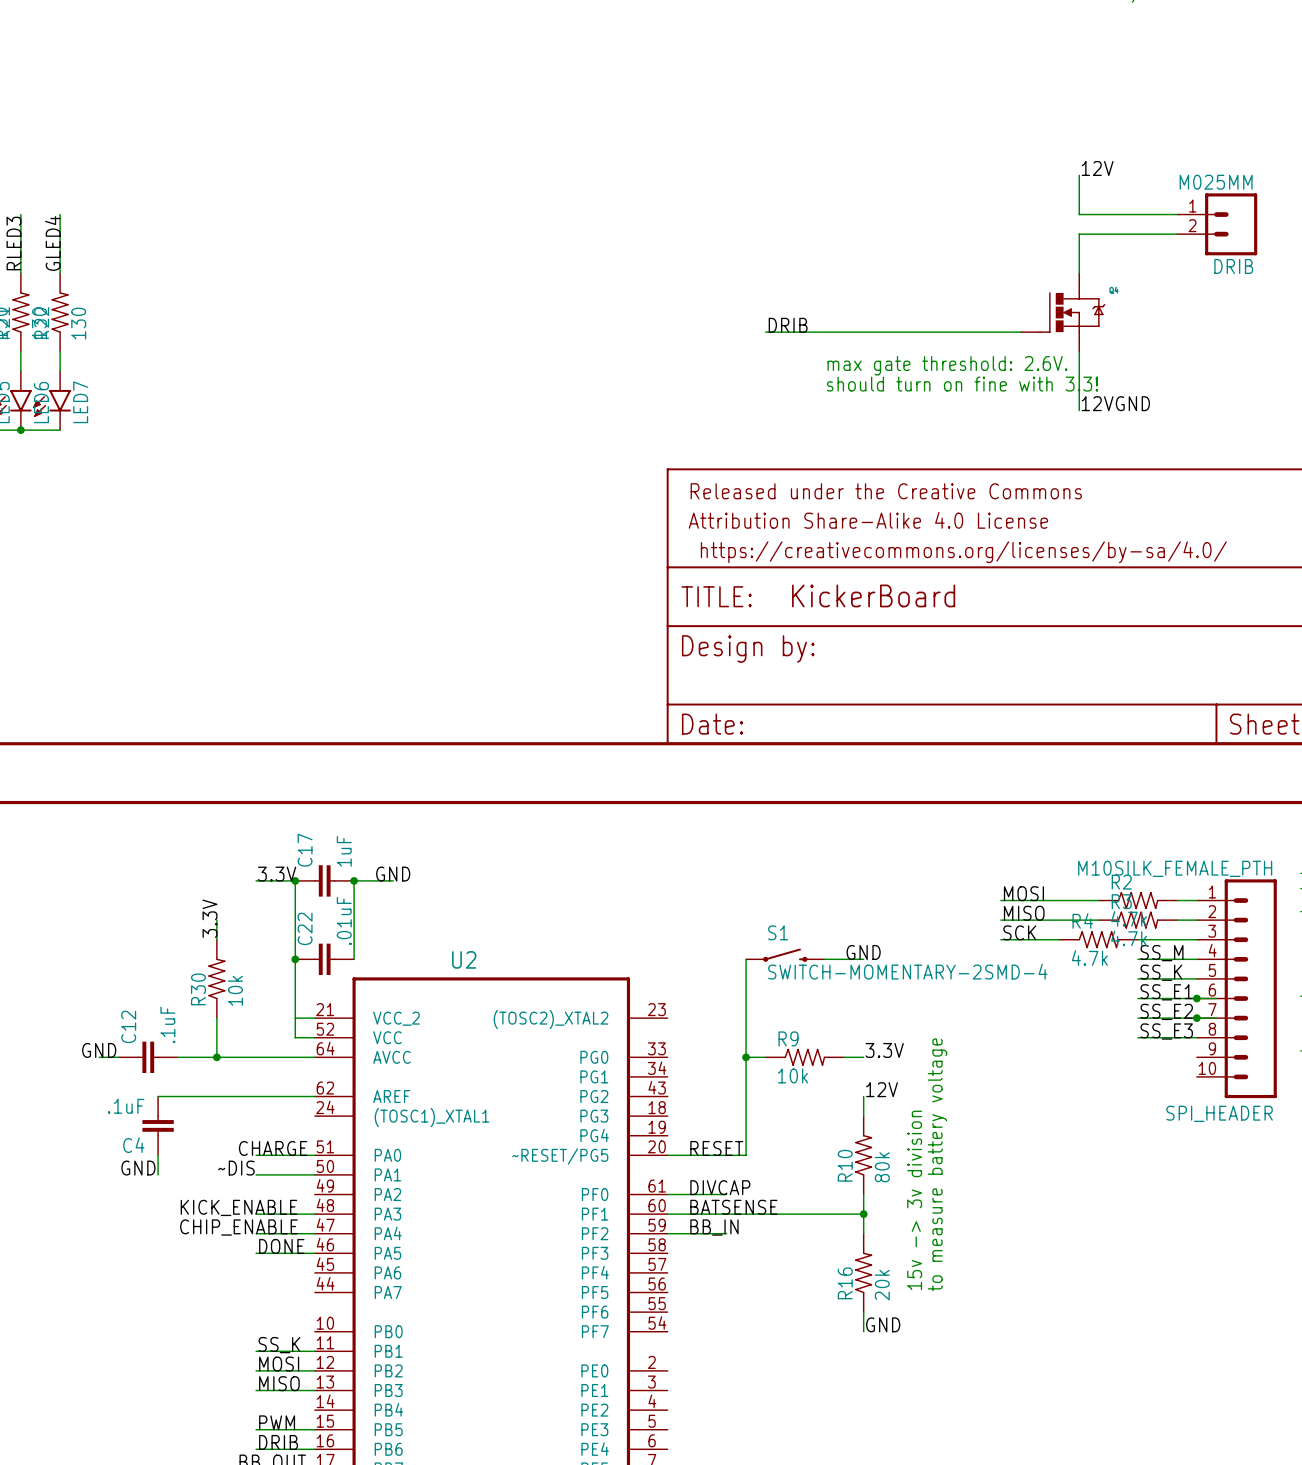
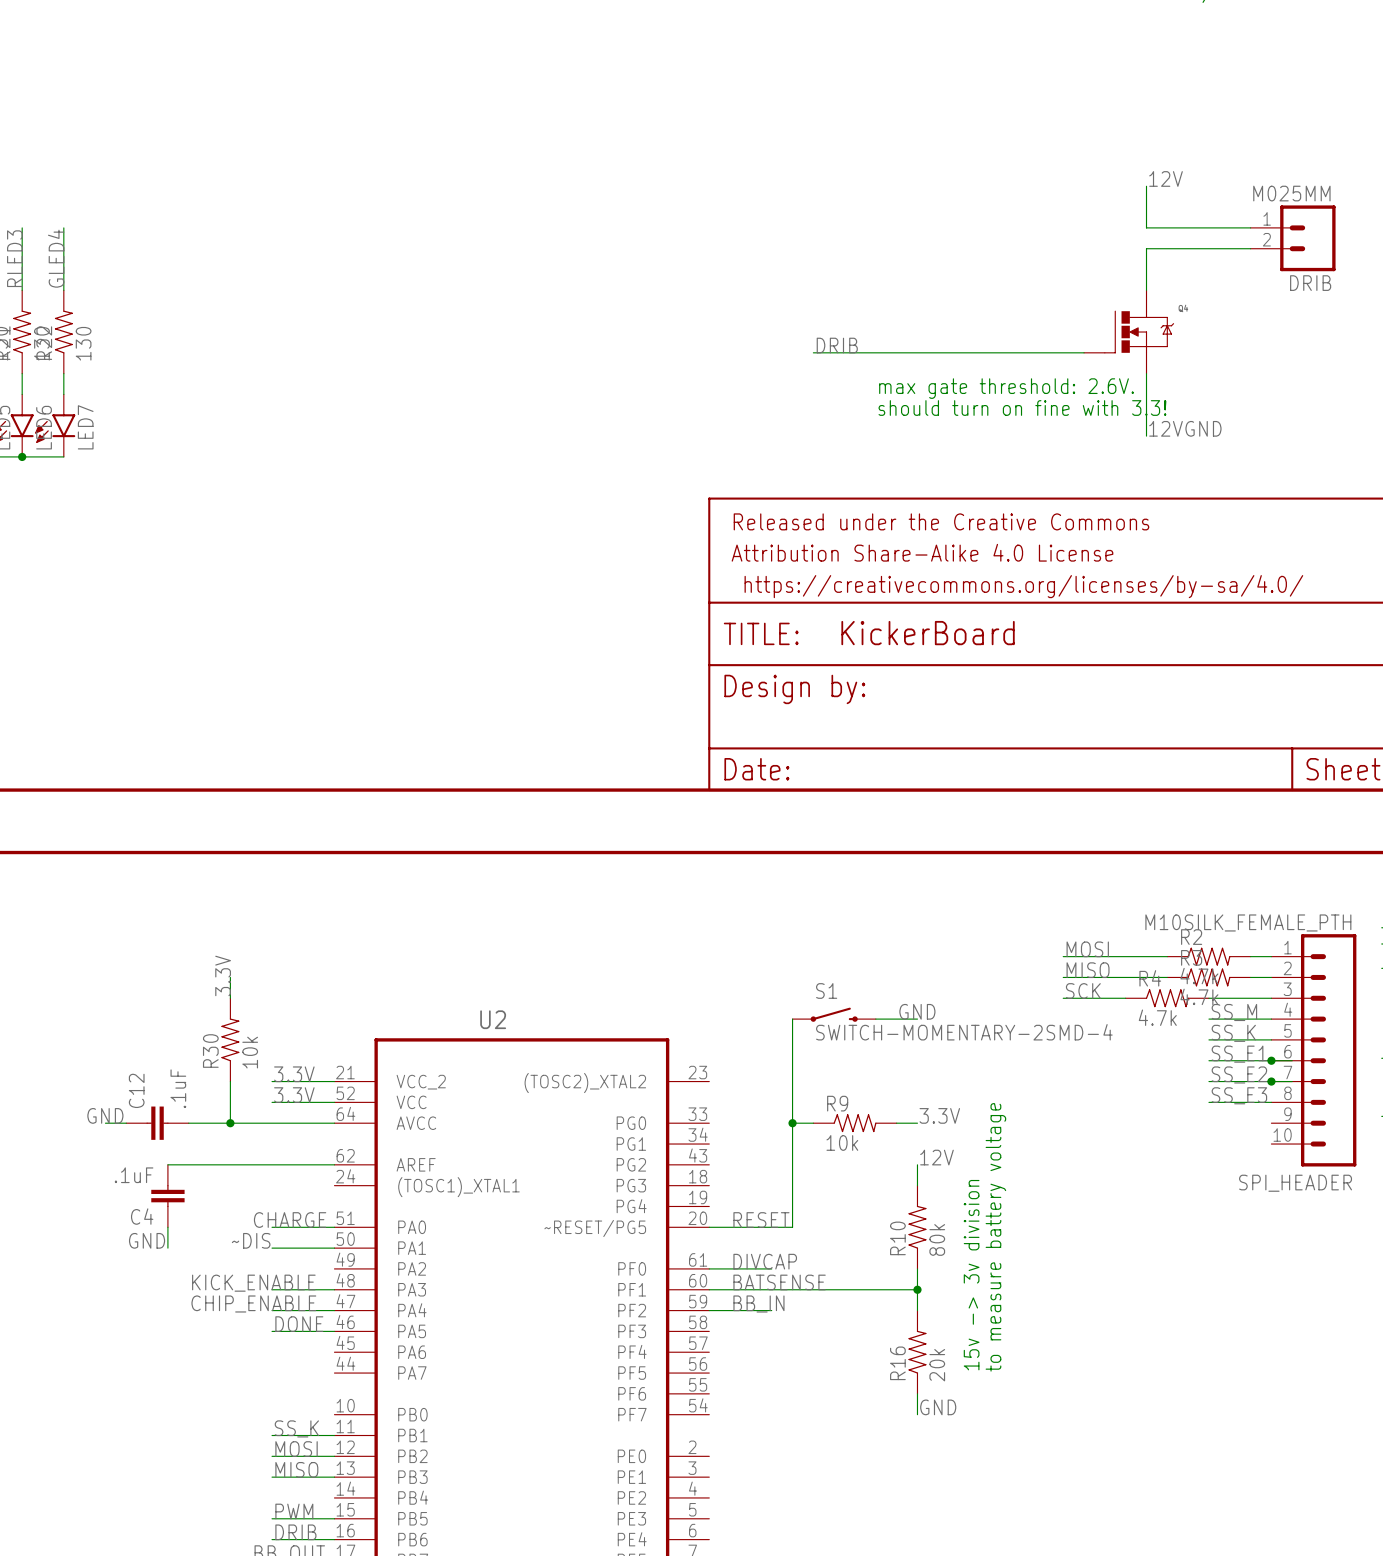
label: 3.3V (277, 874) -> none
label: GND (393, 874) -> none
wire: (256, 880) (295, 880) (295, 1037) -> (272, 1102) (313, 1102)
junction: (295, 880) -> none
C17: 1uF (324, 880) -> none
junction: (354, 880) -> none
wire: (393, 880) (354, 880) (354, 959) -> none
junction: (295, 959) -> none
C22: .01uF (324, 959) -> none
label: none -> 3.3V (294, 1074)
wire: none -> (272, 1081) (313, 1081)
label: none -> 3.3V (294, 1095)

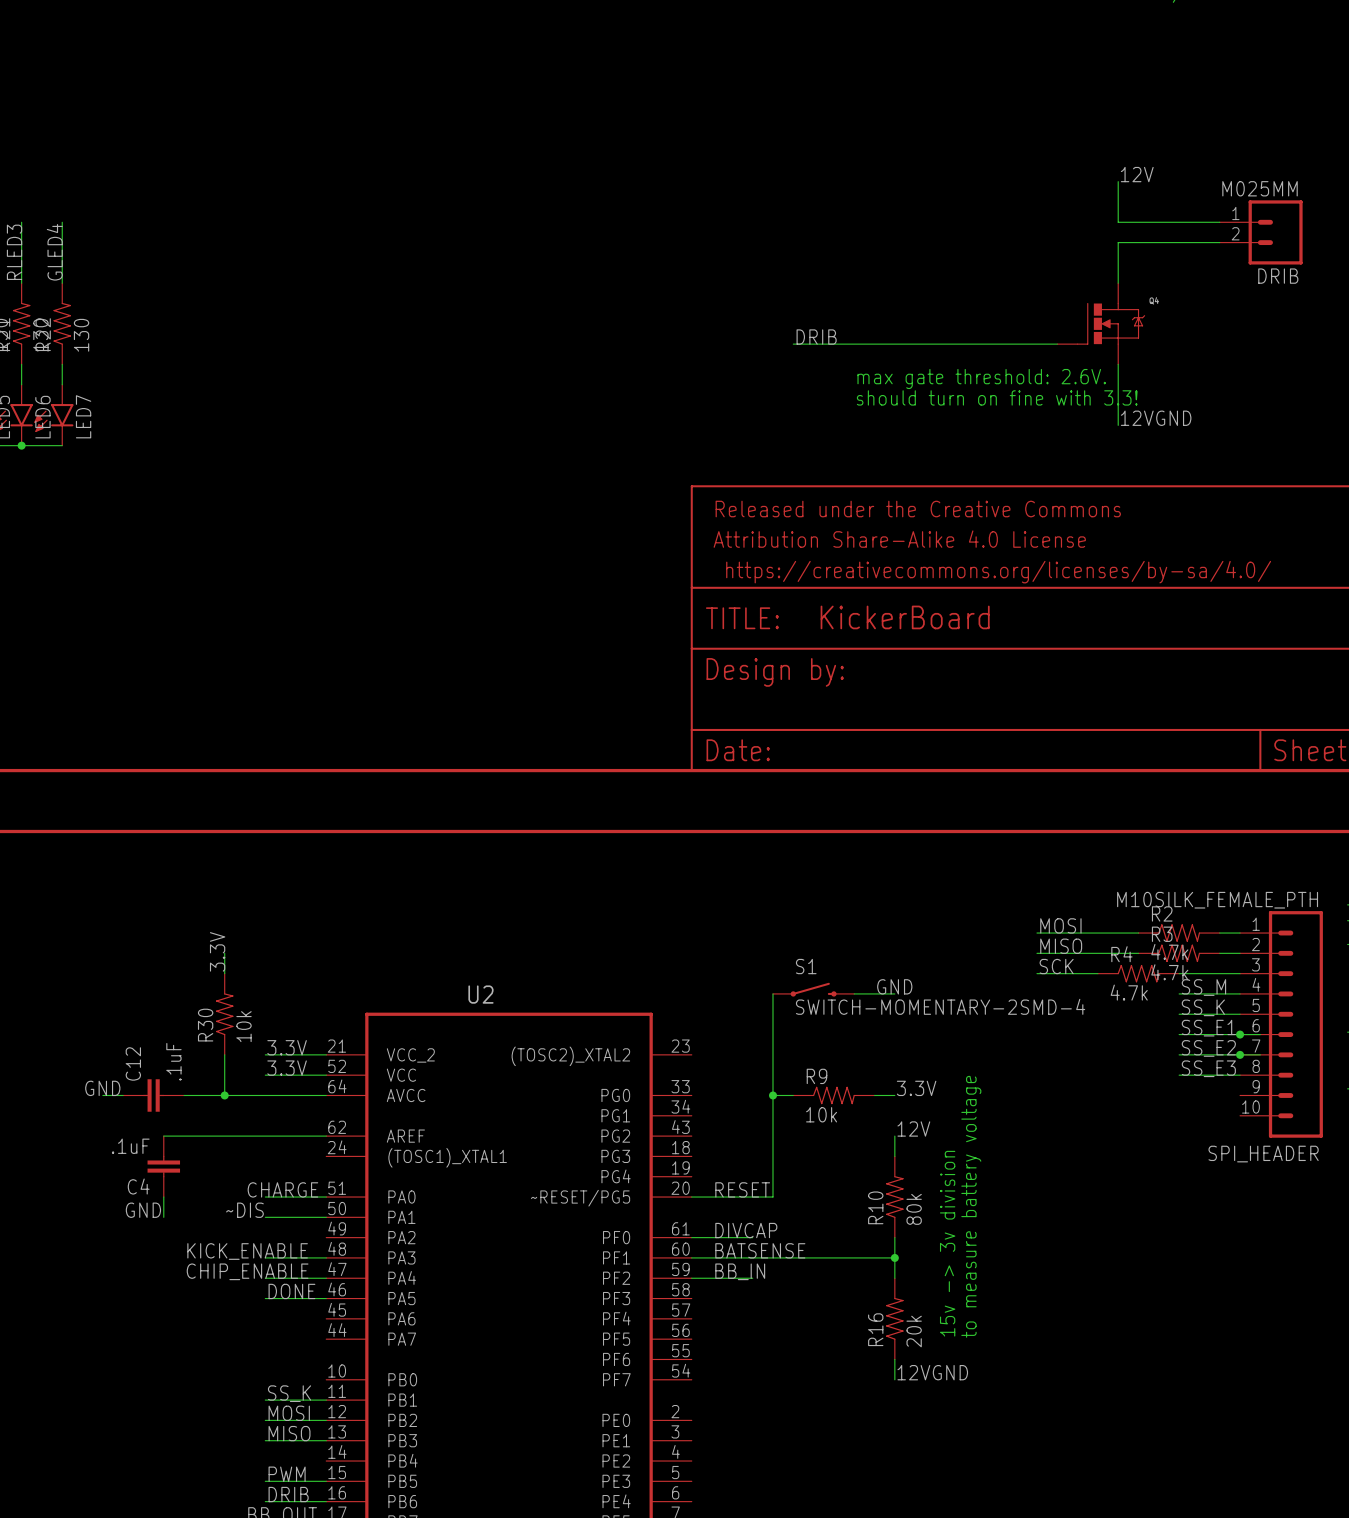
label: GND (938, 1407) -> 12VGND (932, 1372)

